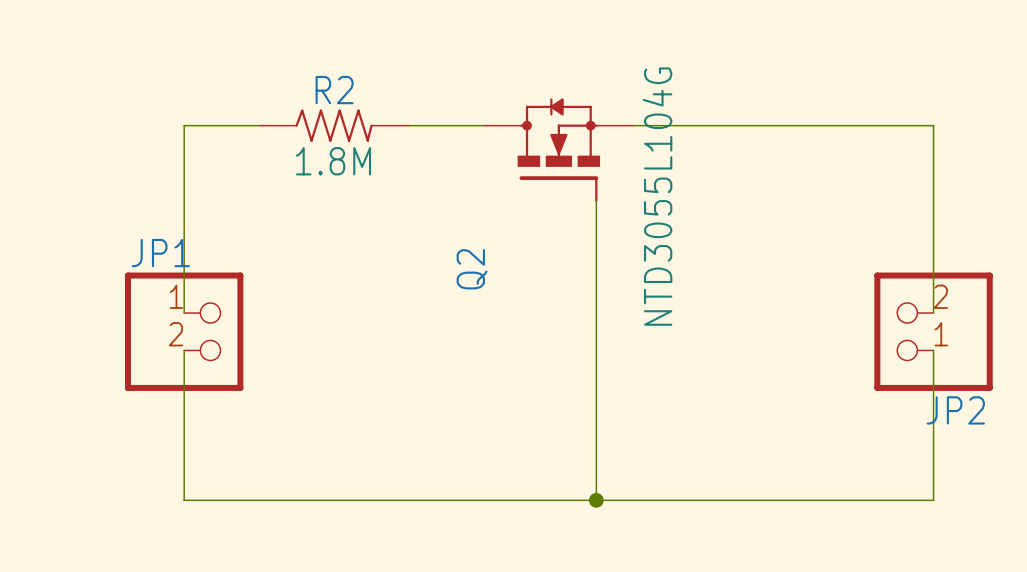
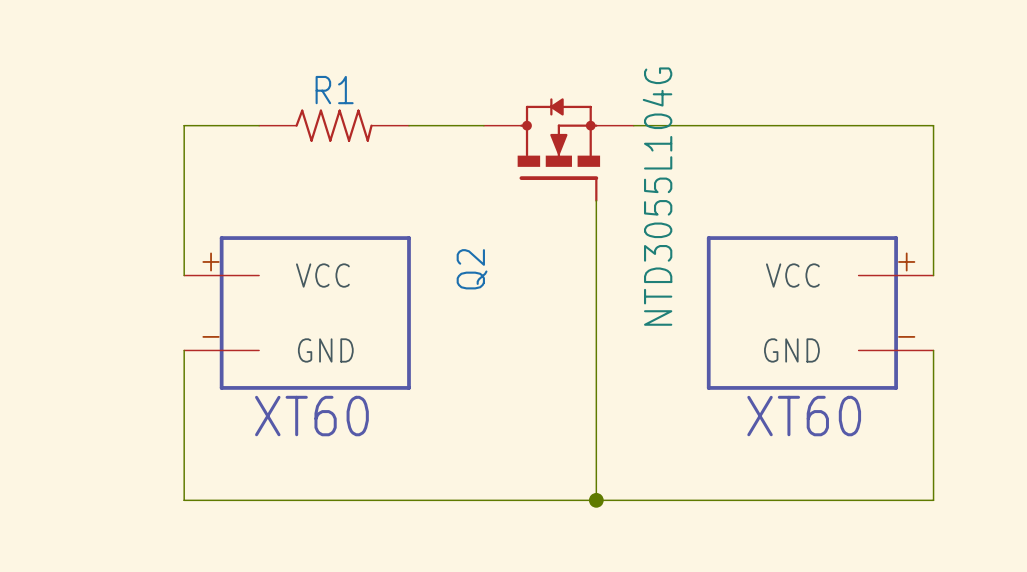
R2 name: R2 (334, 90) -> R1 (334, 90)
R2 value: 1.8M (333, 161) -> none
wire: (184, 275) (184, 313) -> none
wire: (933, 275) (933, 313) -> none
part: none -> (297, 313)
part: none -> (820, 313)
JP1: (184, 331) -> none
JP2: (933, 331) -> none

